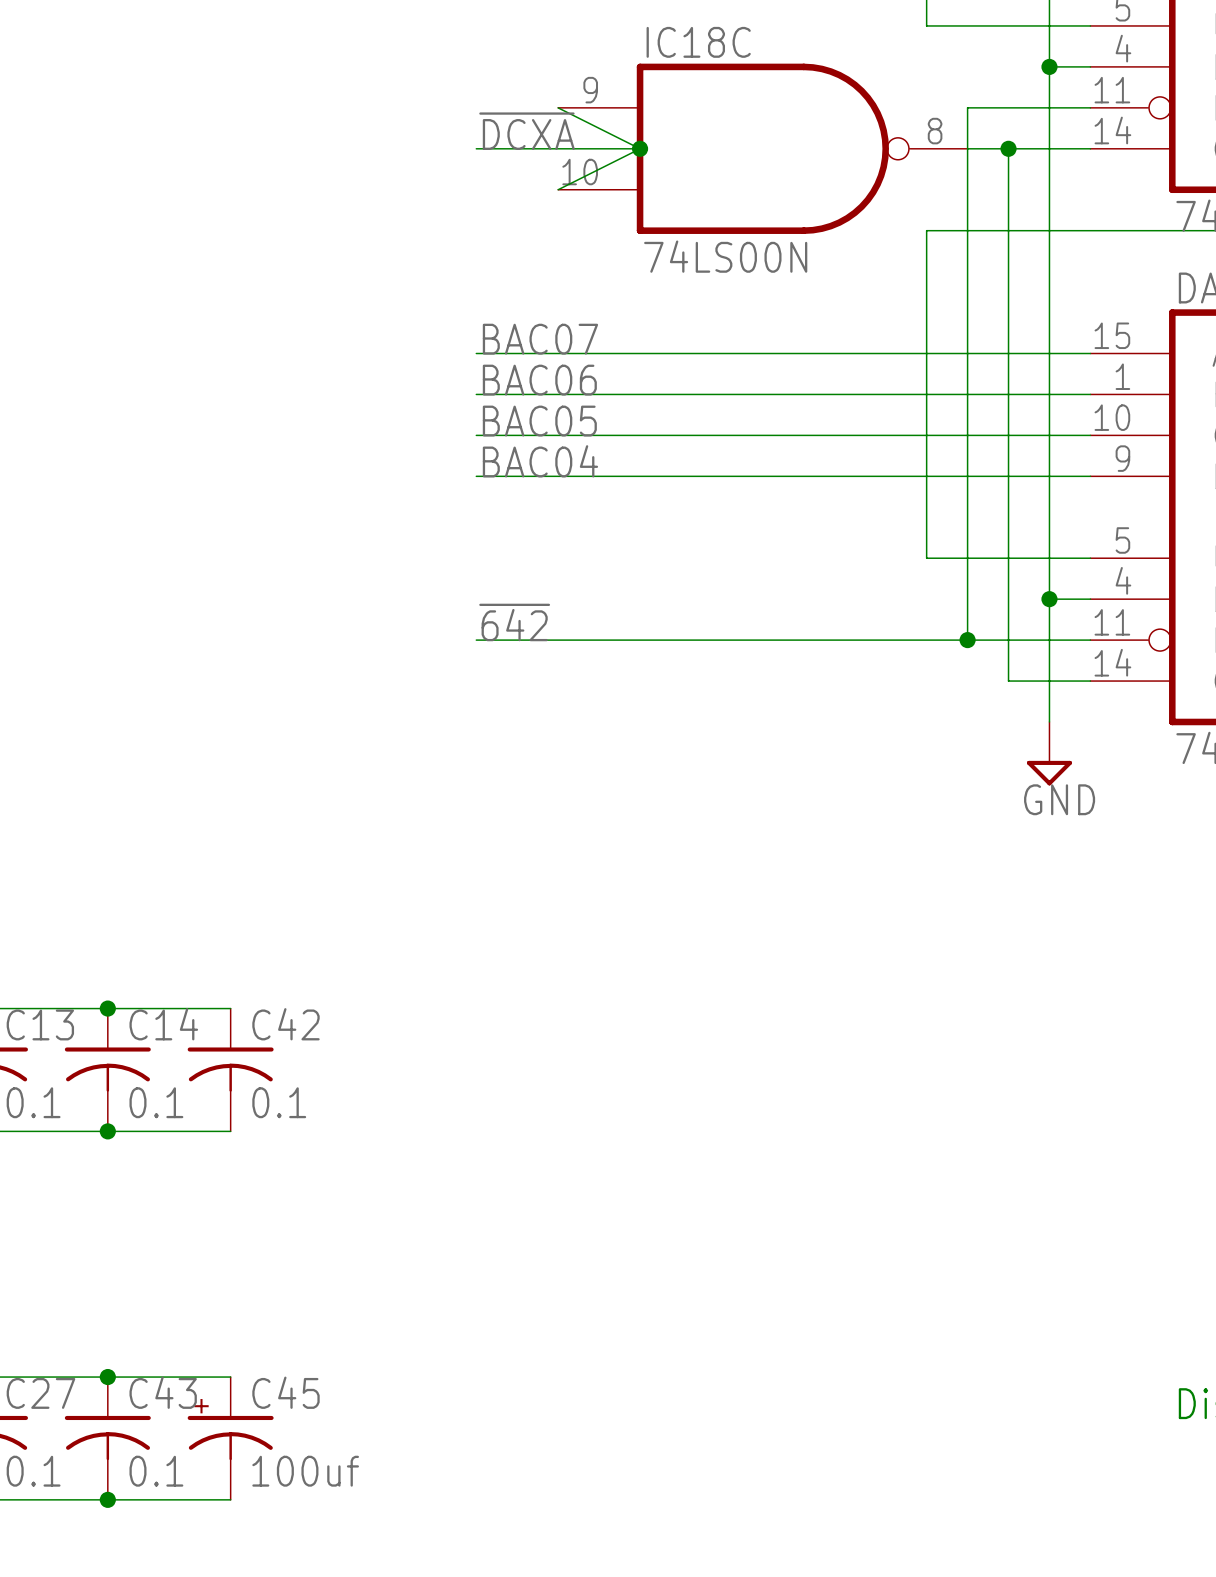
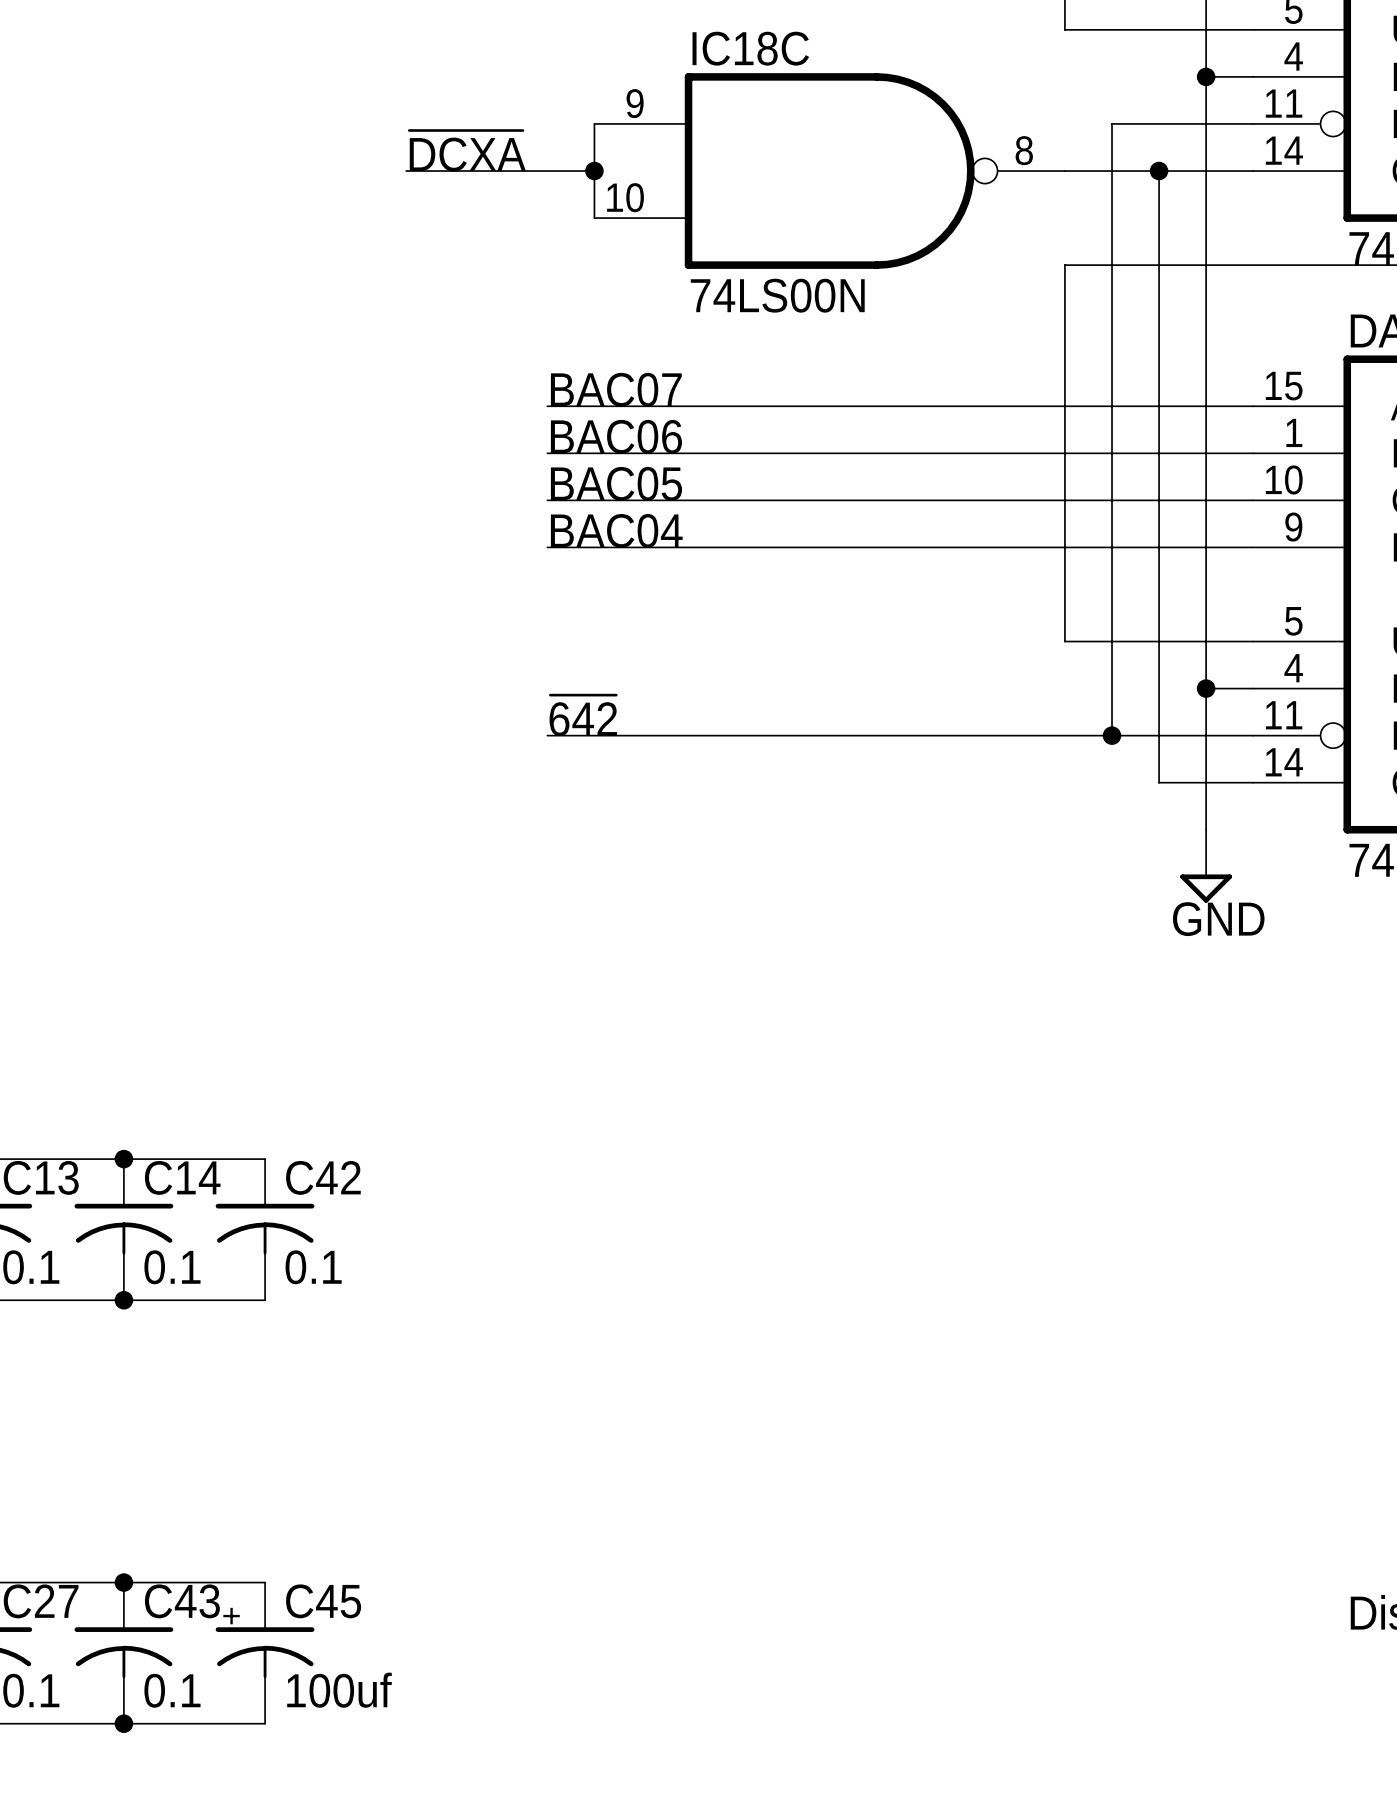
wire: none -> (594, 123) (594, 218)
wire: (558, 107) (640, 148) -> none
label position: ~{DCXA} (526, 131) -> ~{DCXA} (467, 150)
wire: (517, 148) (640, 148) -> (406, 171) (547, 171)
junction: none -> (594, 171)
wire: (640, 148) (558, 189) -> none
junction: (640, 148) -> none
IC18C position: (762, 148) -> (829, 171)

